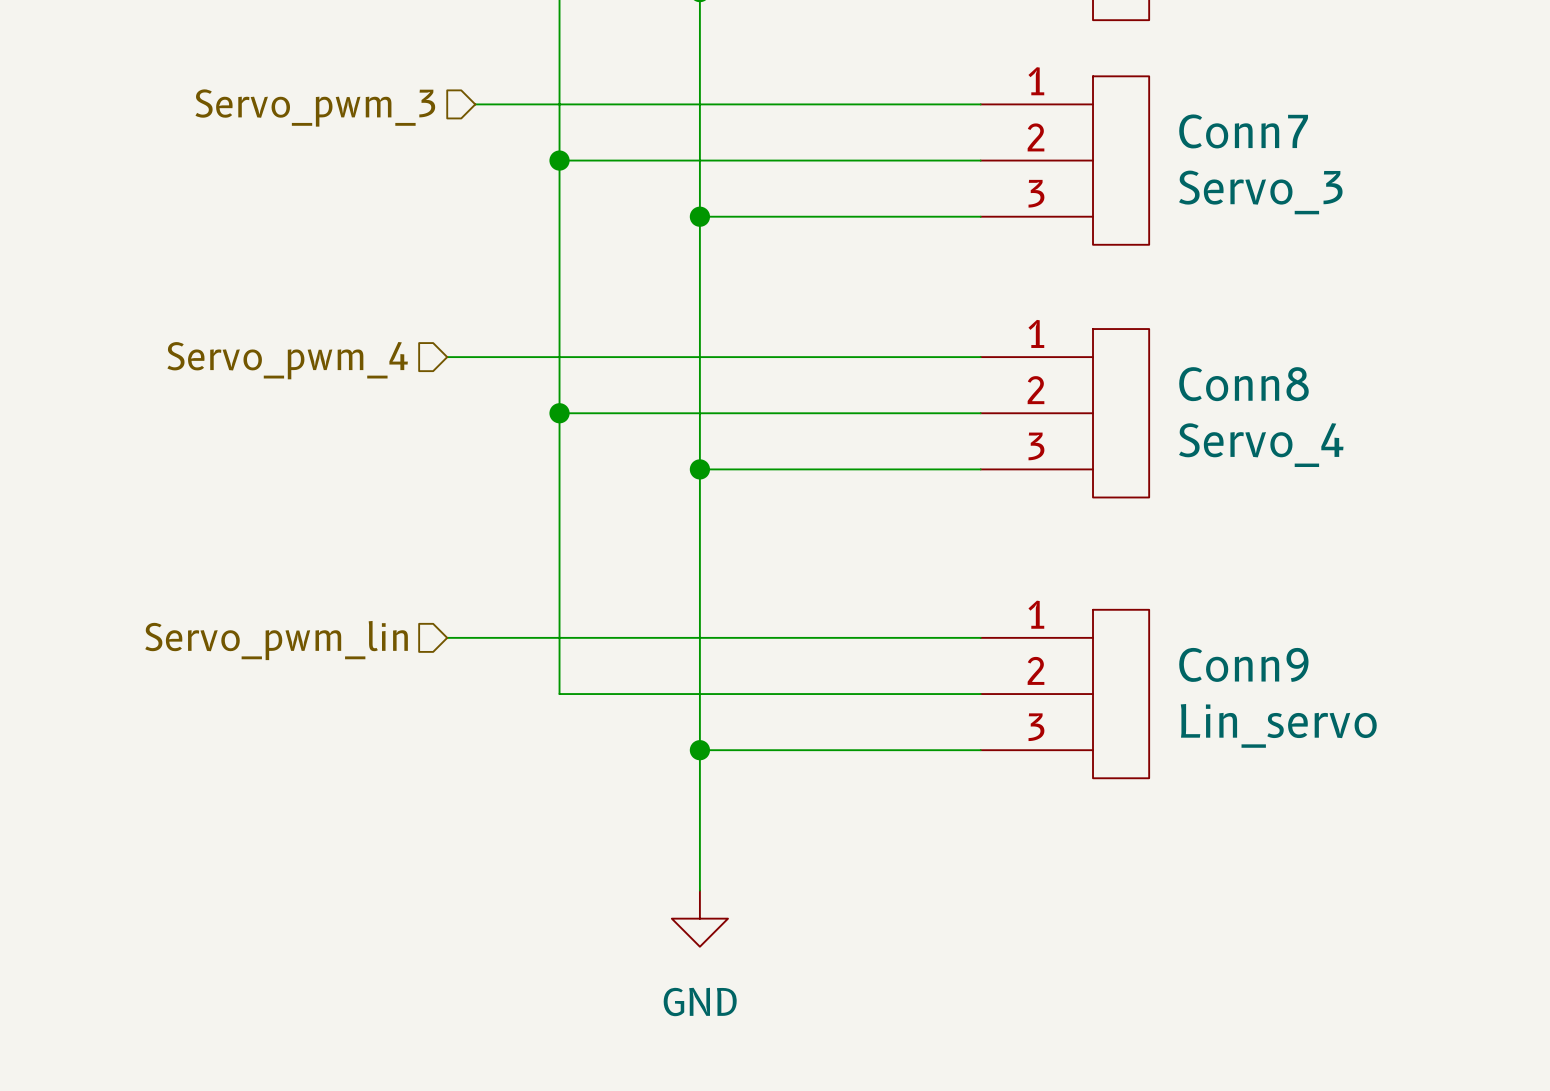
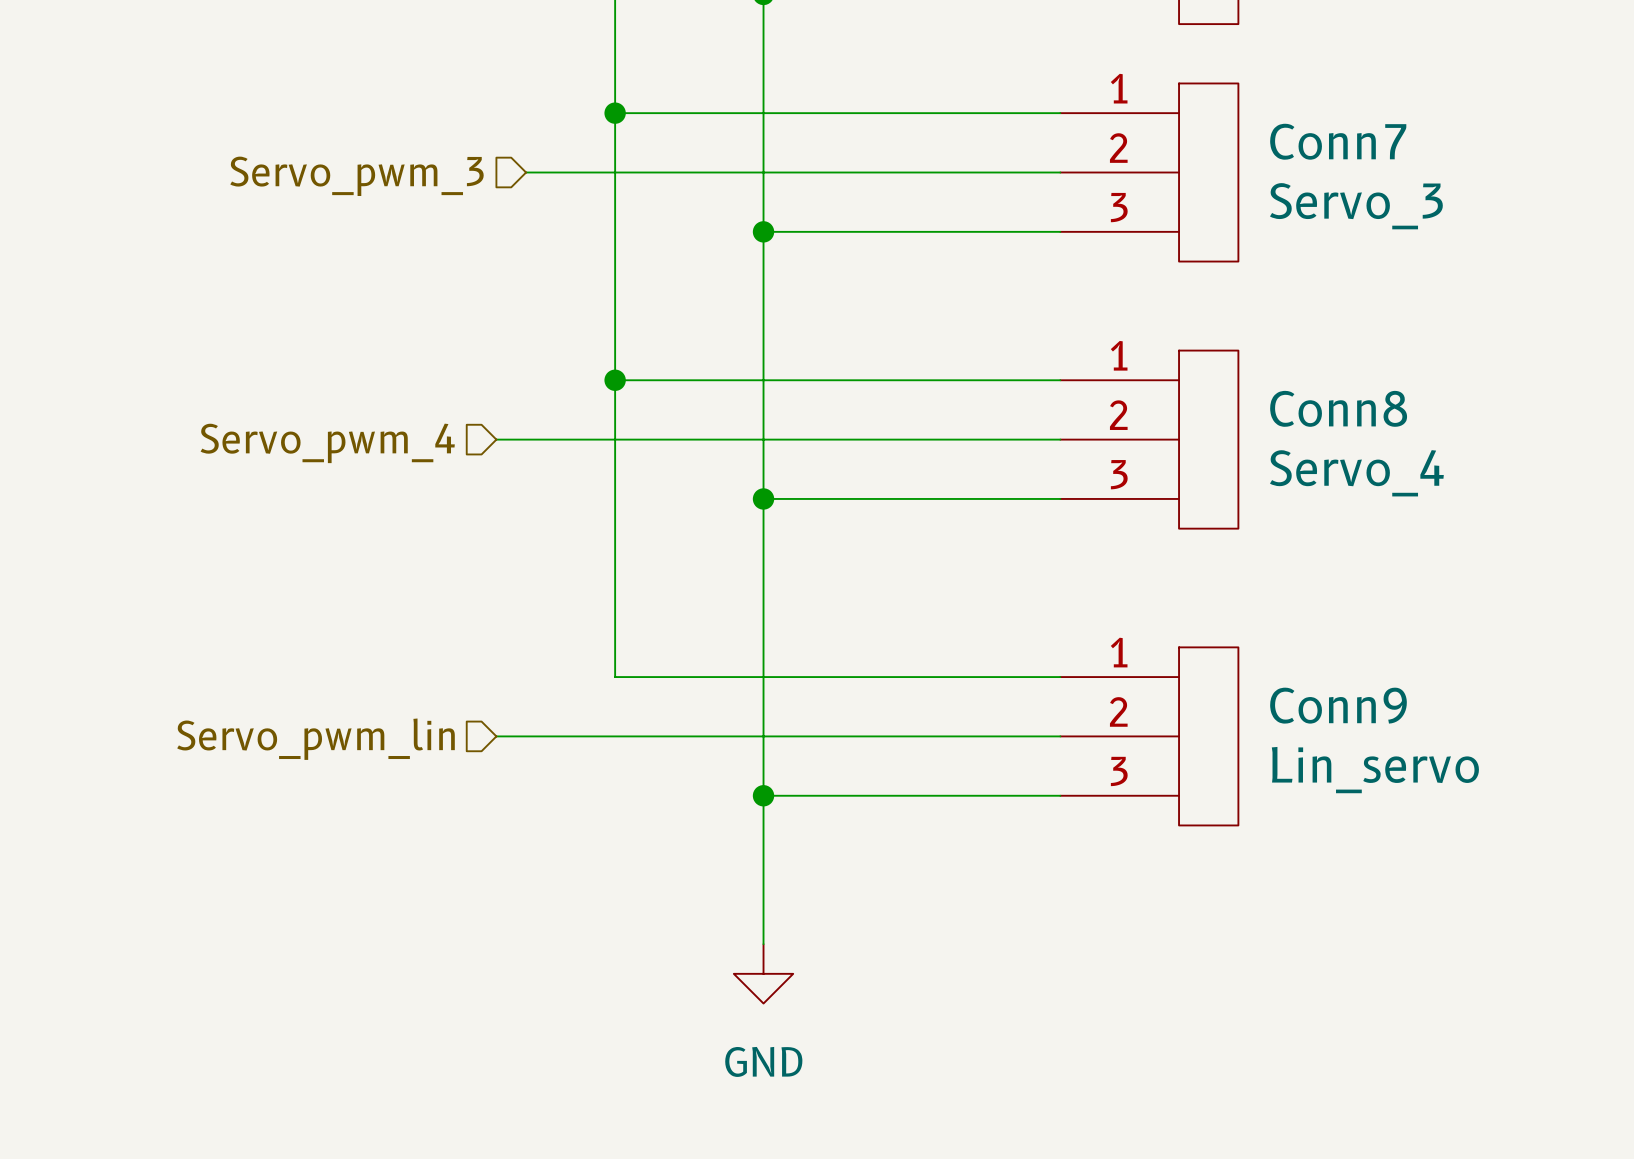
wire: (475, 104) (559, 104) -> (526, 172) (615, 172)
hierarchical label position: Servo_pwm_3 (315, 108) -> Servo_pwm_3 (356, 176)
junction position: (559, 160) -> (615, 113)
wire: (447, 357) (559, 357) -> (496, 439) (615, 439)
hierarchical label position: Servo_pwm_4 (287, 360) -> Servo_pwm_4 (327, 443)
junction position: (559, 413) -> (615, 380)
wire: (447, 637) (559, 637) (559, 694) -> (496, 736) (615, 736)
hierarchical label position: Servo_pwm_lin (276, 640) -> Servo_pwm_lin (316, 739)

